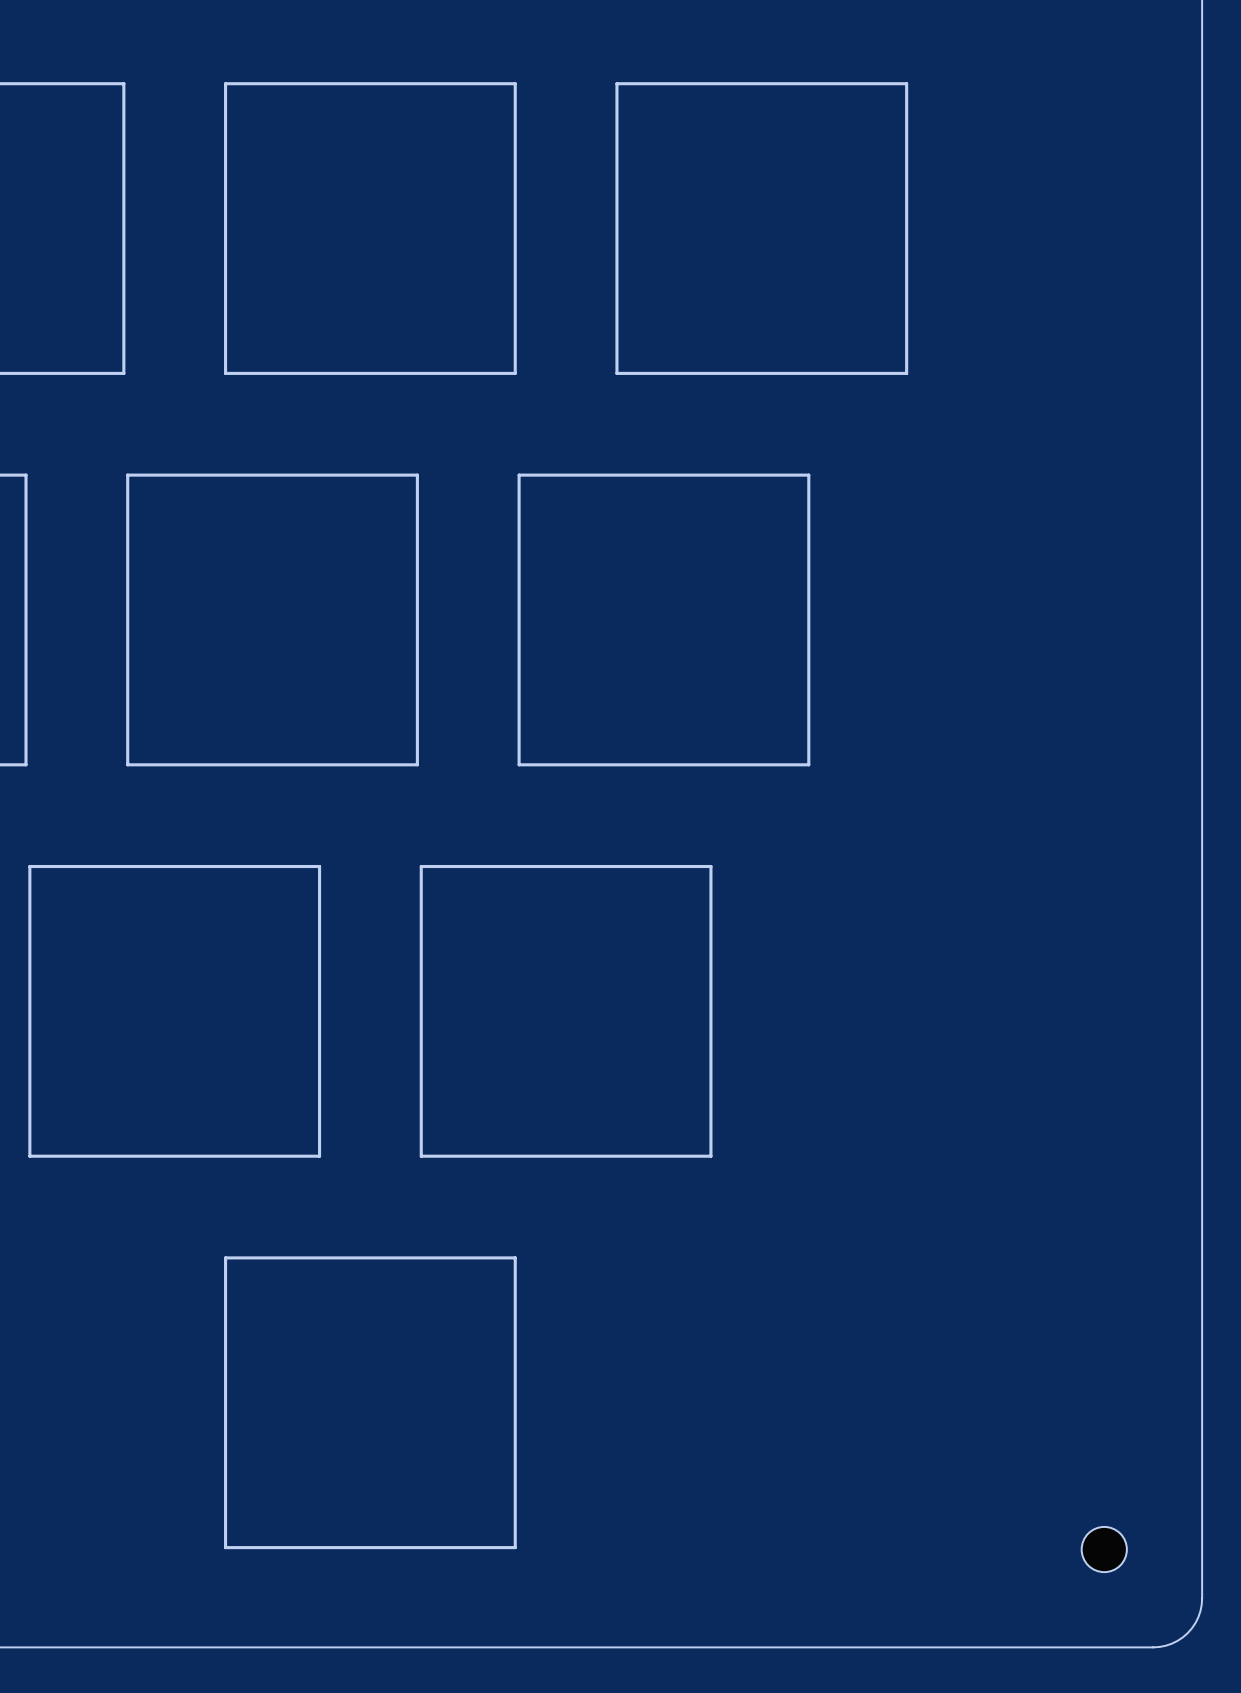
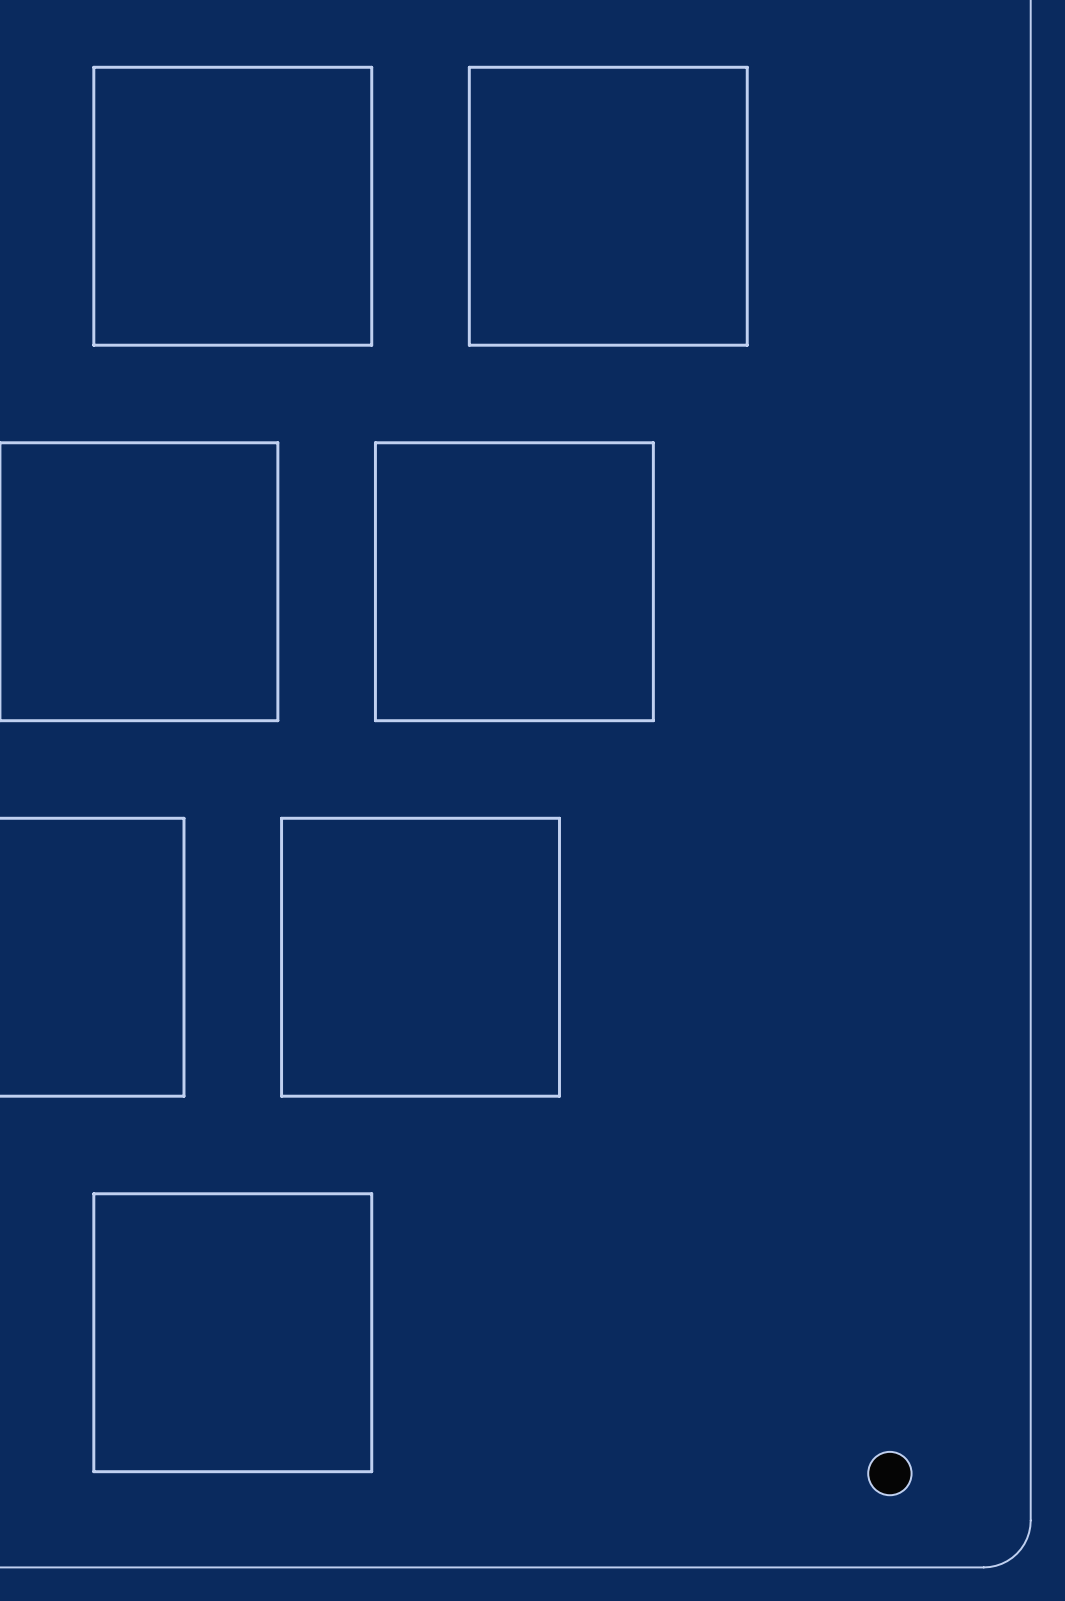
part position: (1104, 1549) -> (889, 1473)

